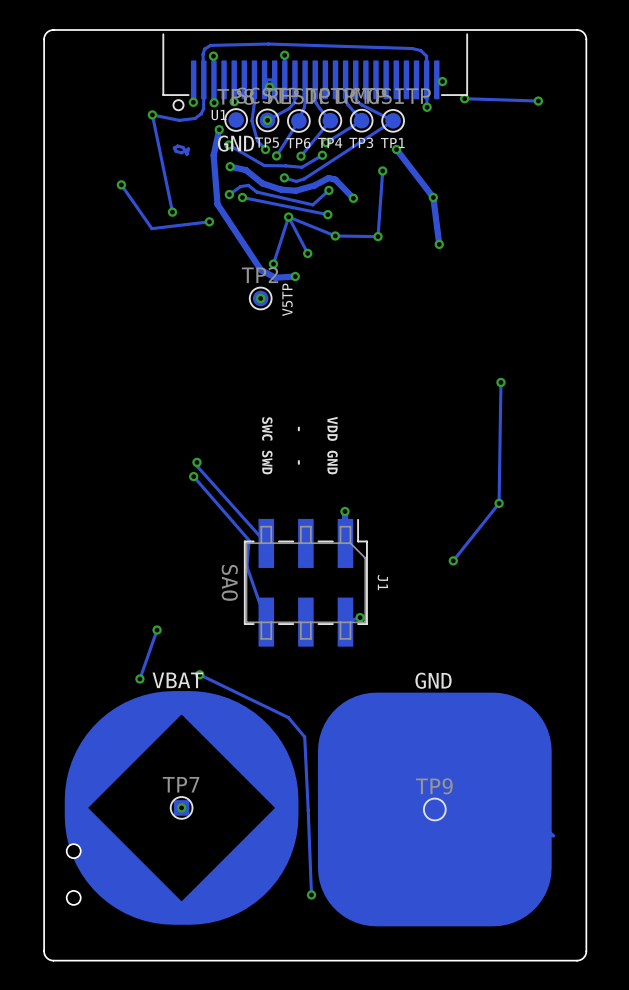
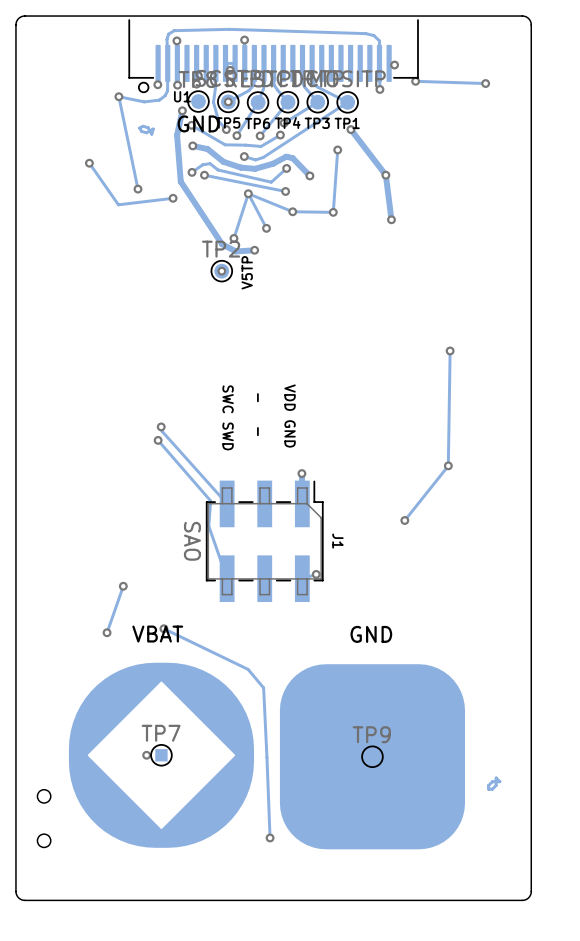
TP7 footprint: [64, 691, 299, 925] -> [68, 662, 255, 848]
TP9 footprint: [317, 692, 552, 927] -> [279, 664, 466, 850]

